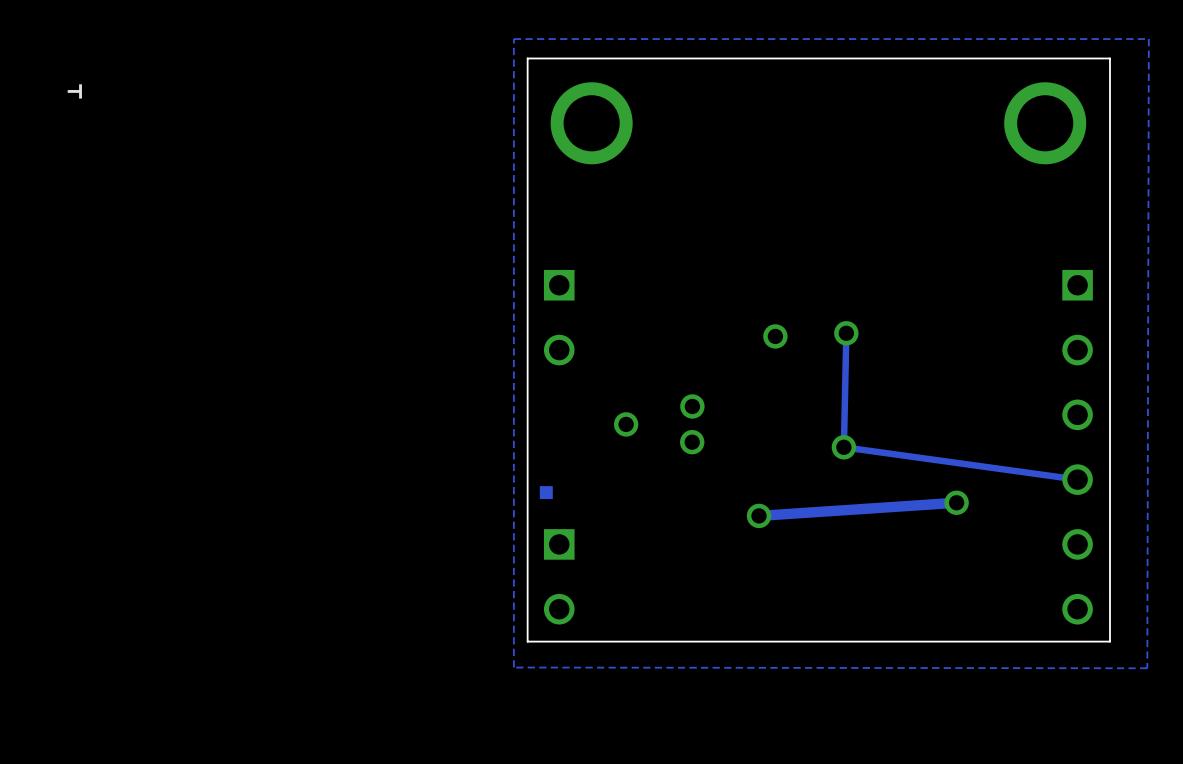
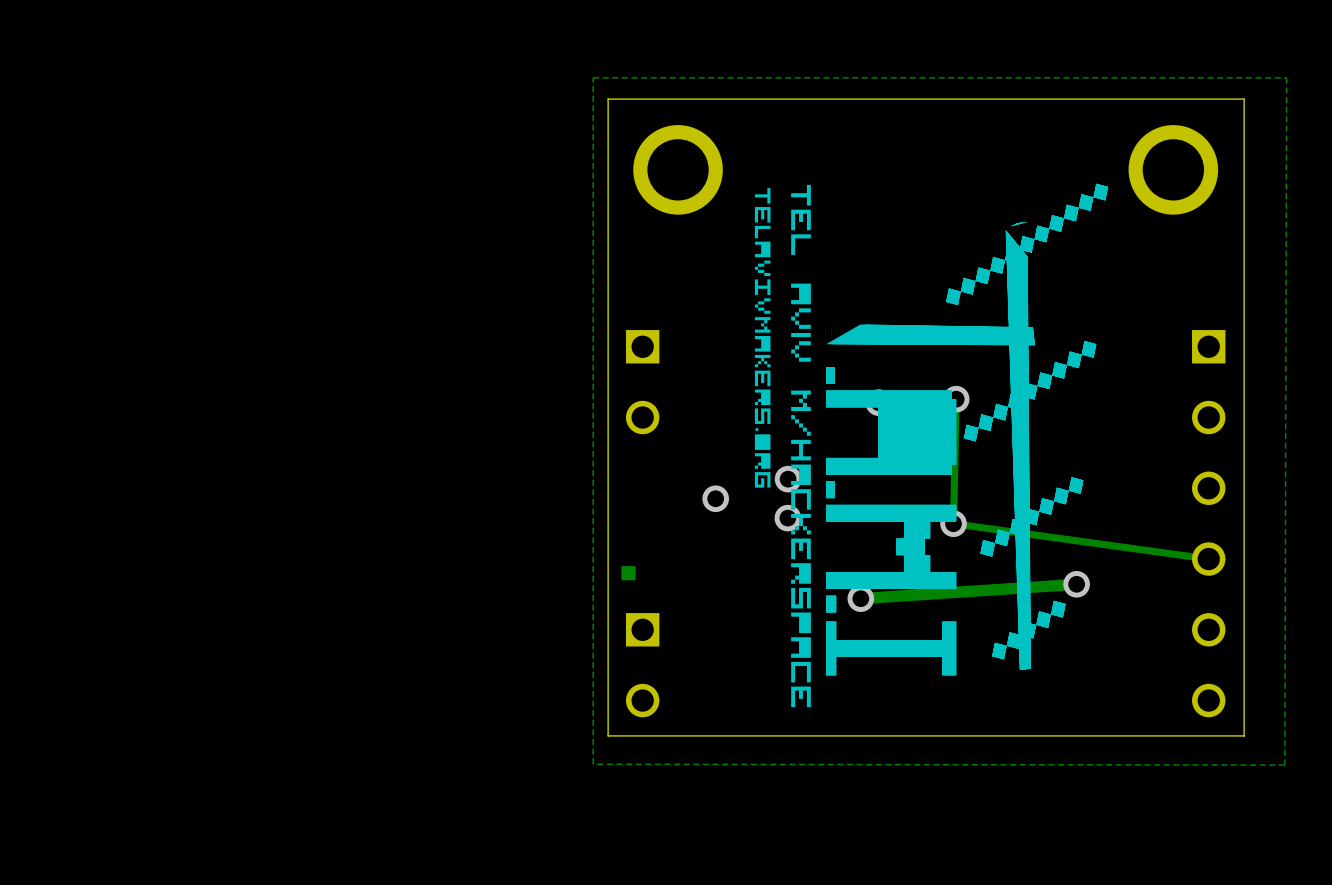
drawing position: (74, 91) -> (762, 195)
drawing: none -> [754, 183, 1109, 708]

